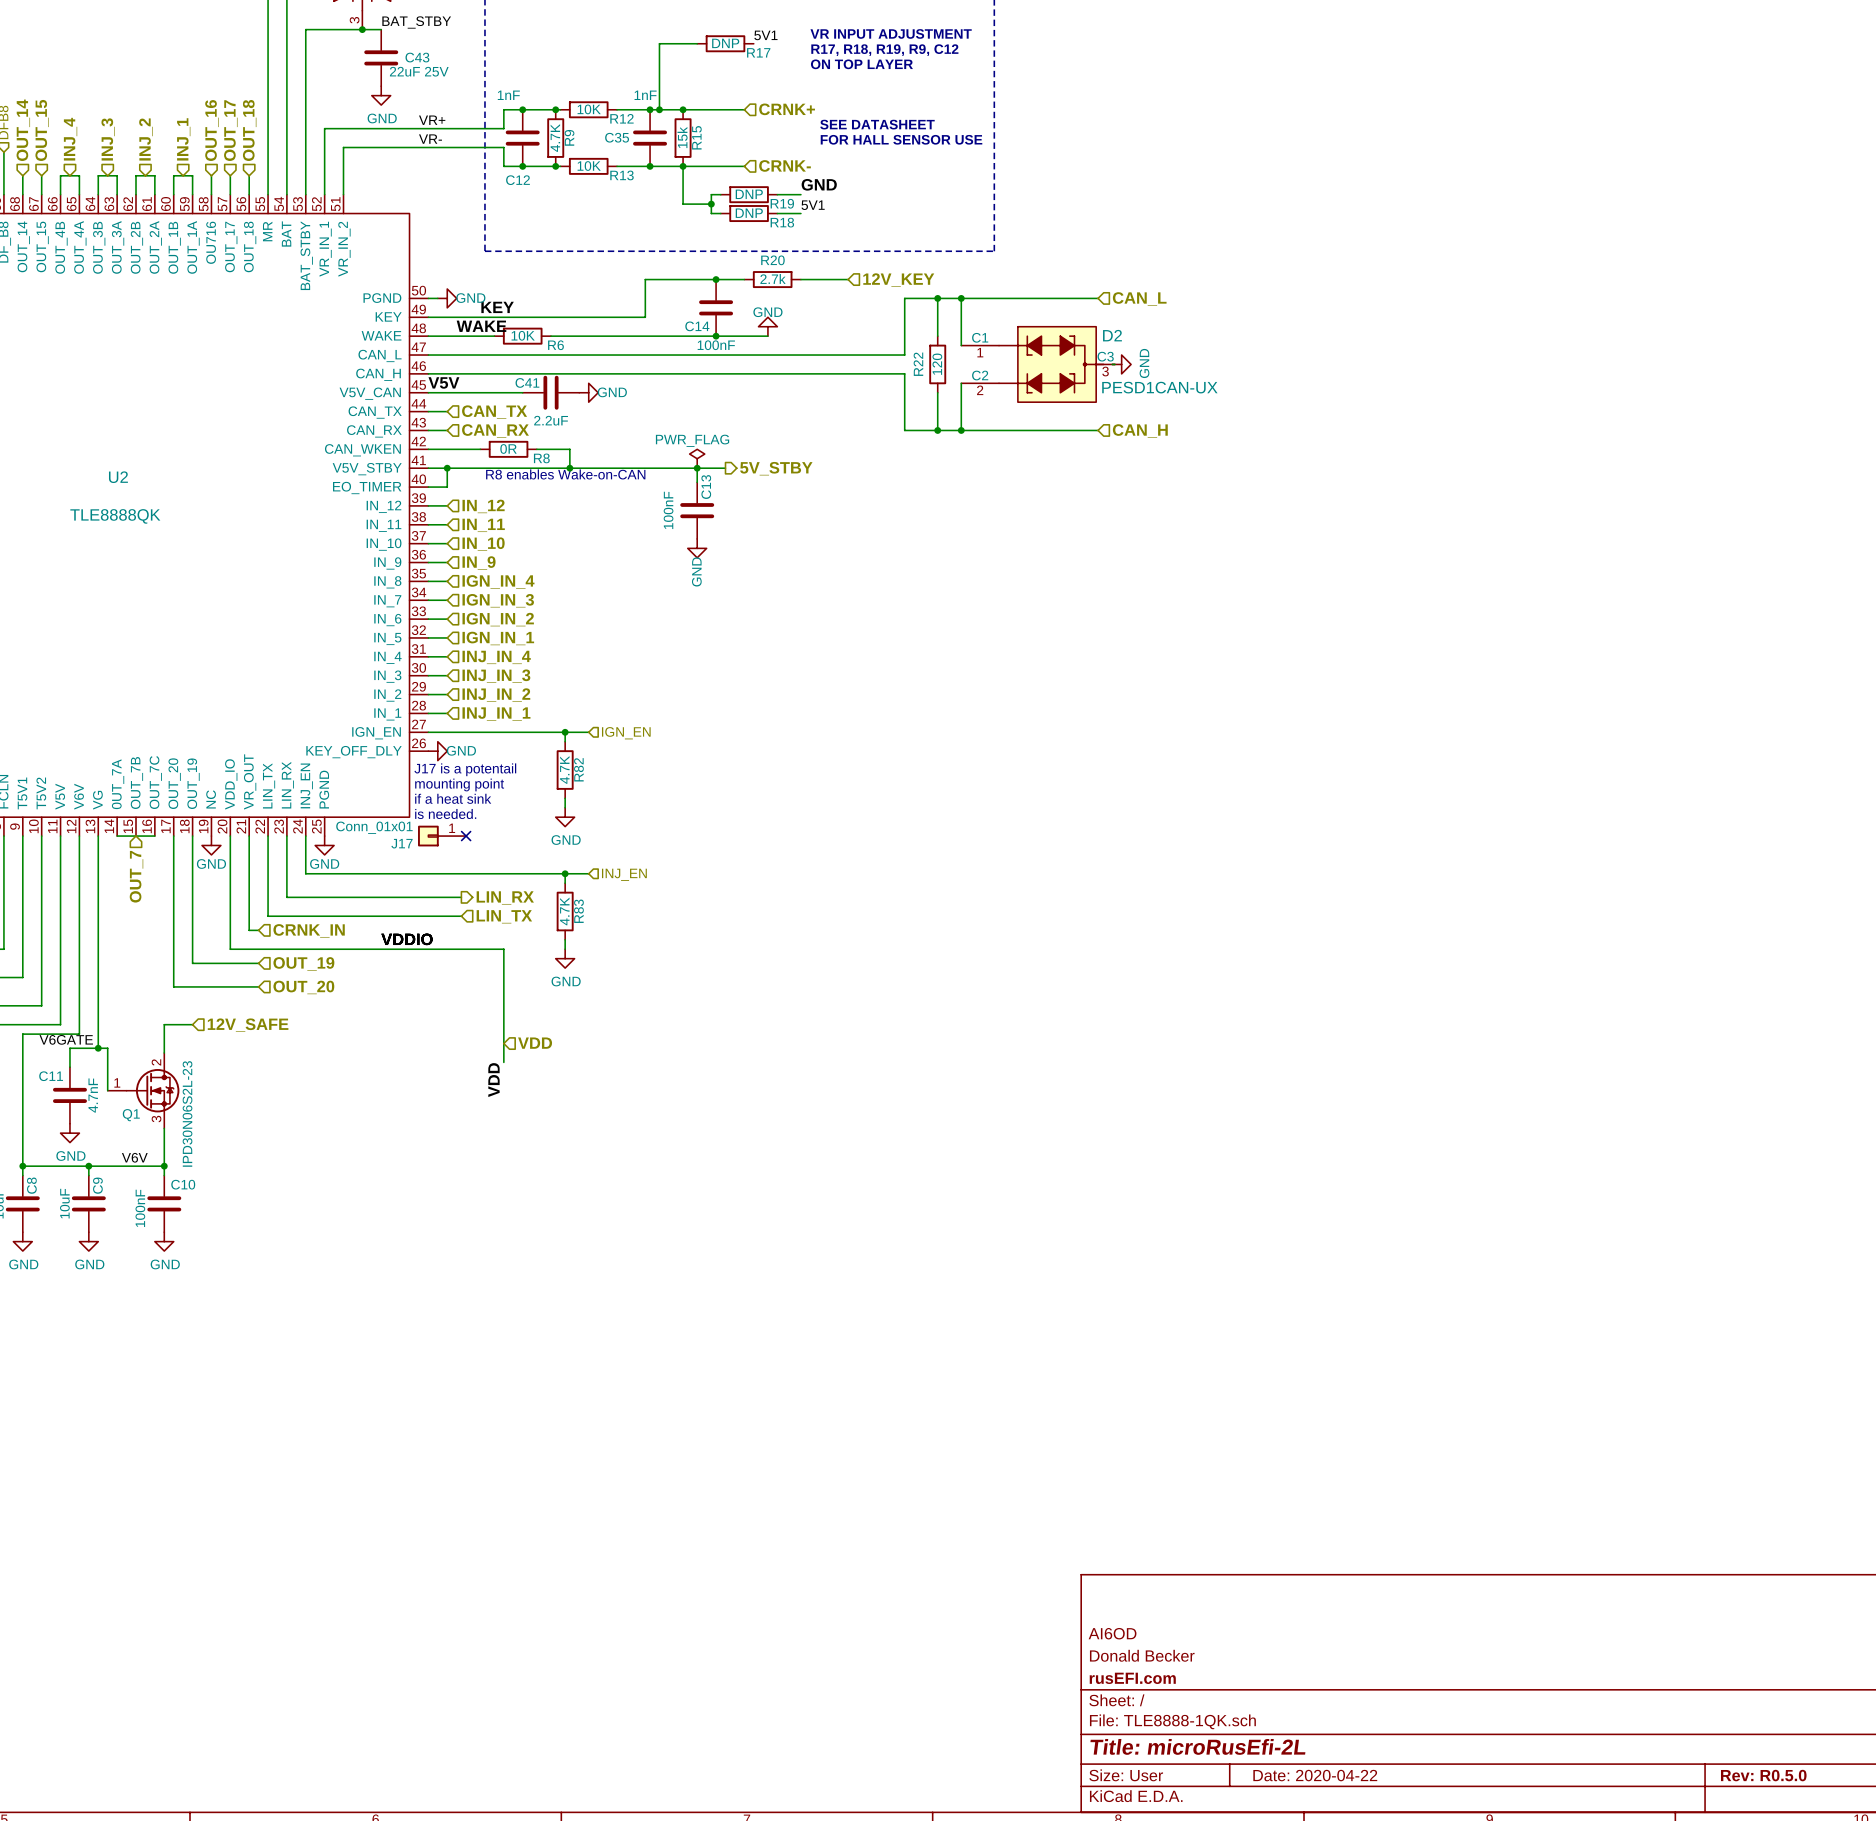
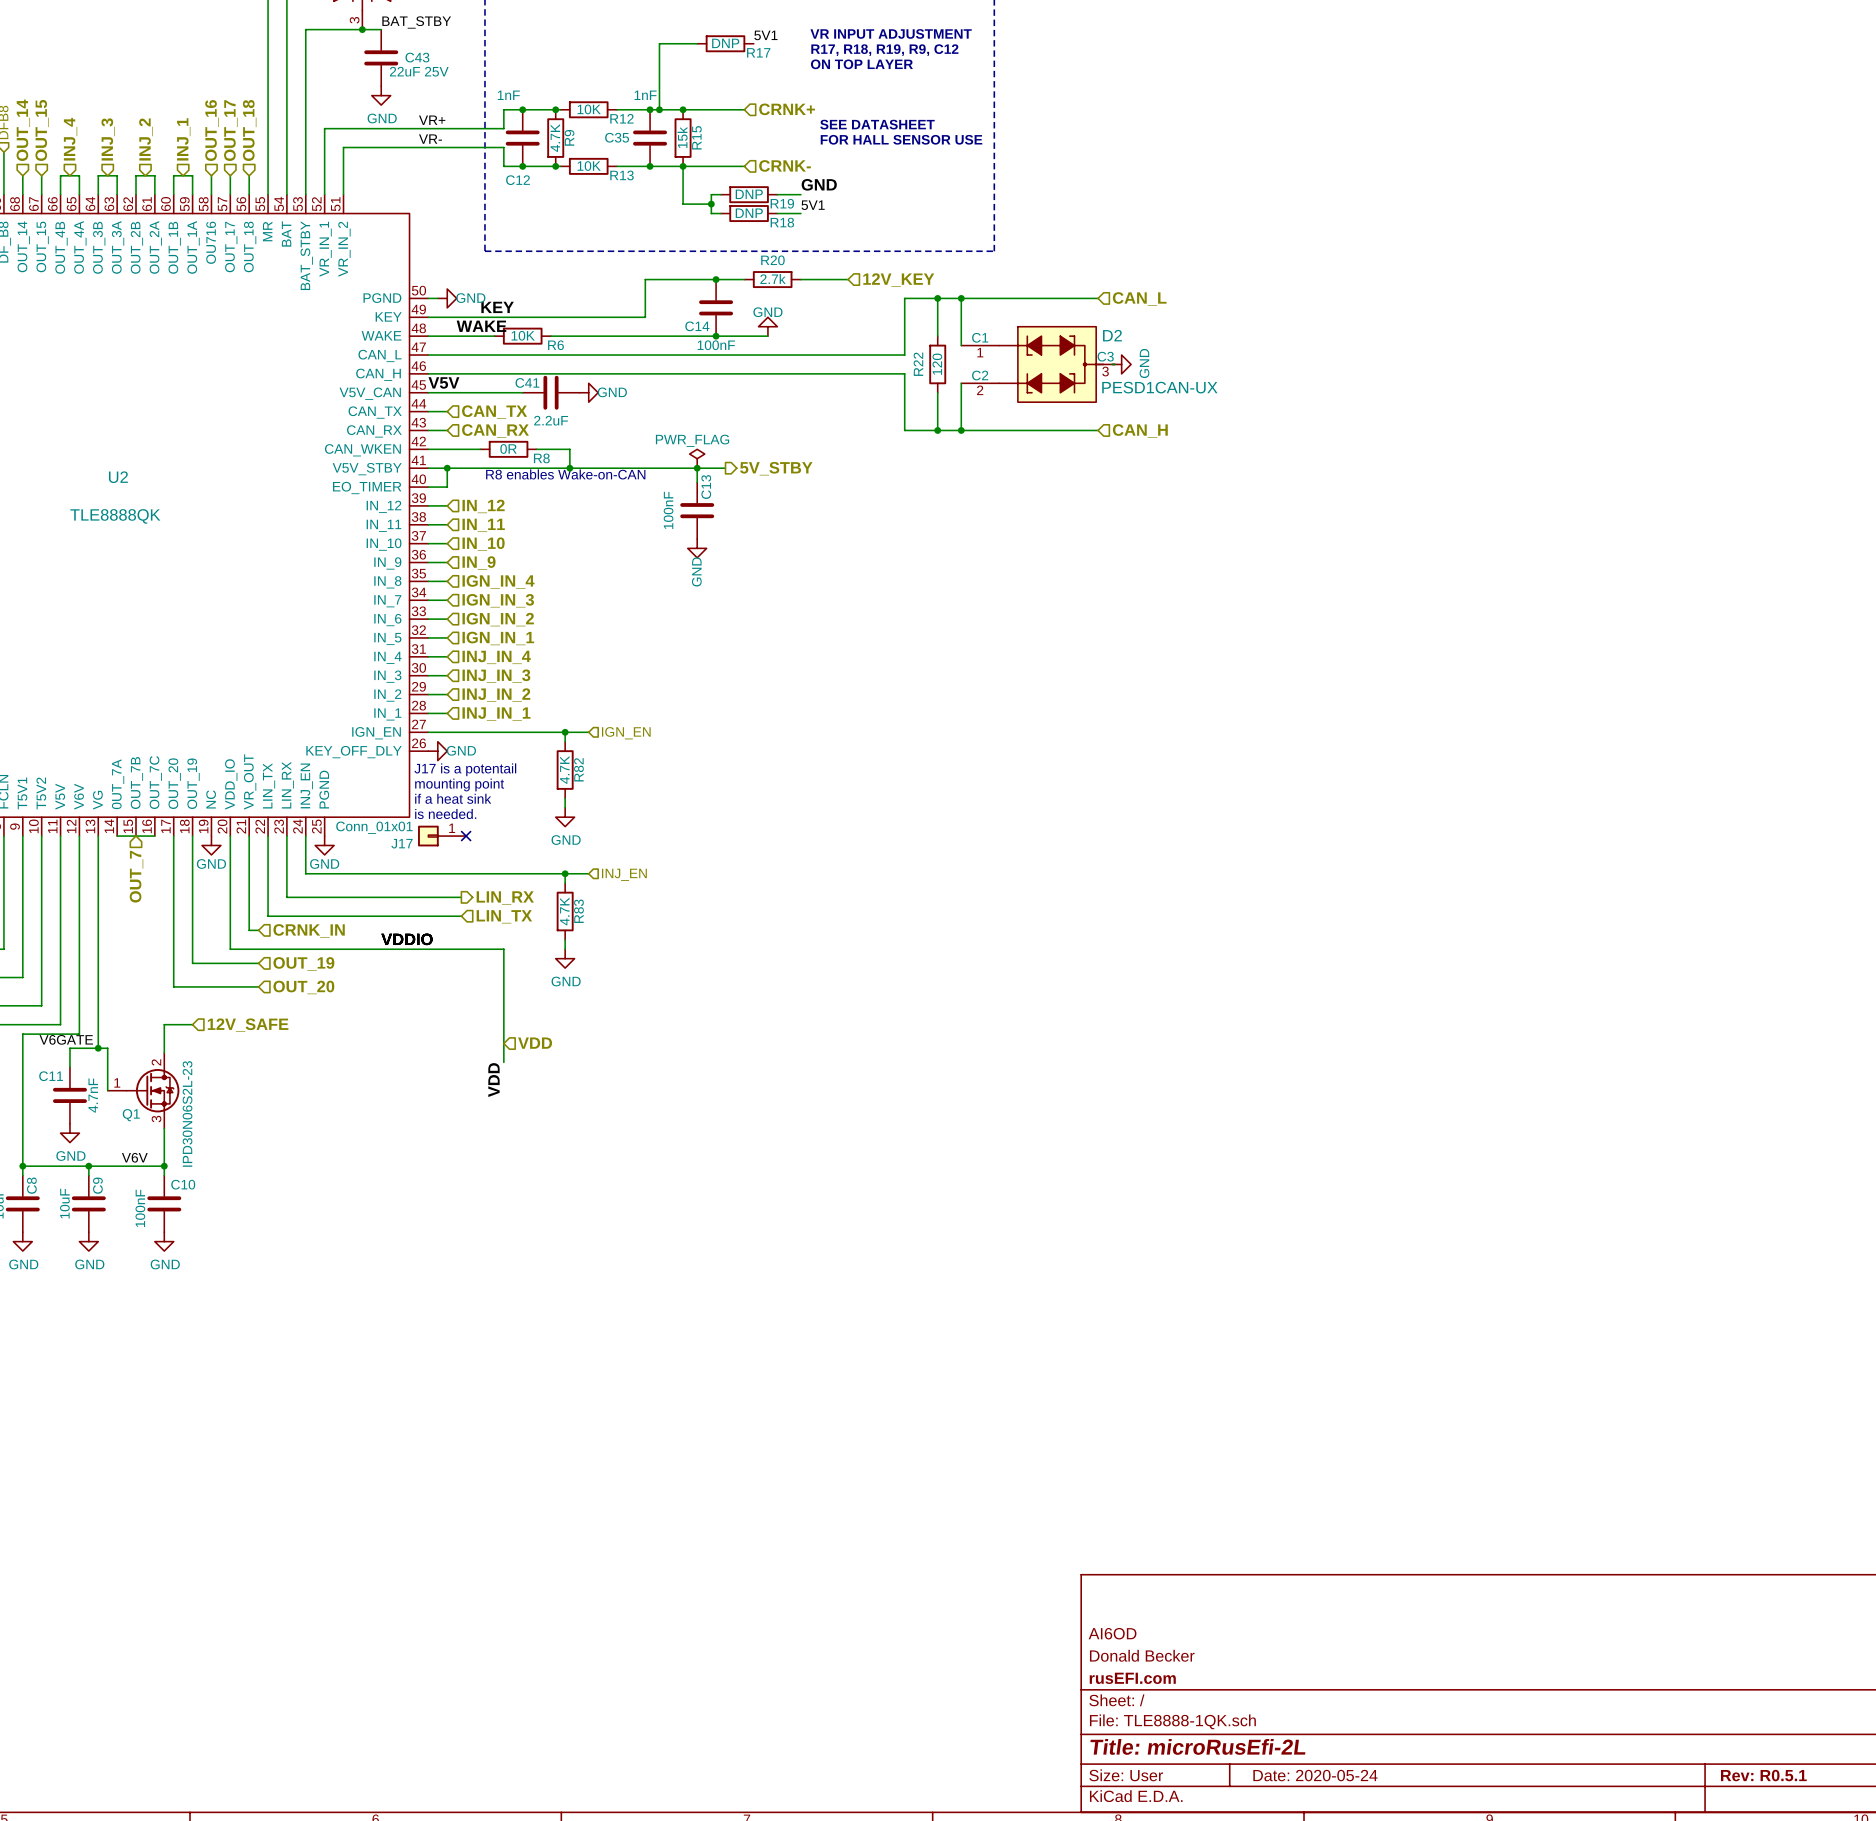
title block: Date: 2020-04-22 (1315, 1775) -> Date: 2020-05-24 (1315, 1775)
title block: Rev: R0.5.0 (1763, 1775) -> Rev: R0.5.1 (1763, 1775)

